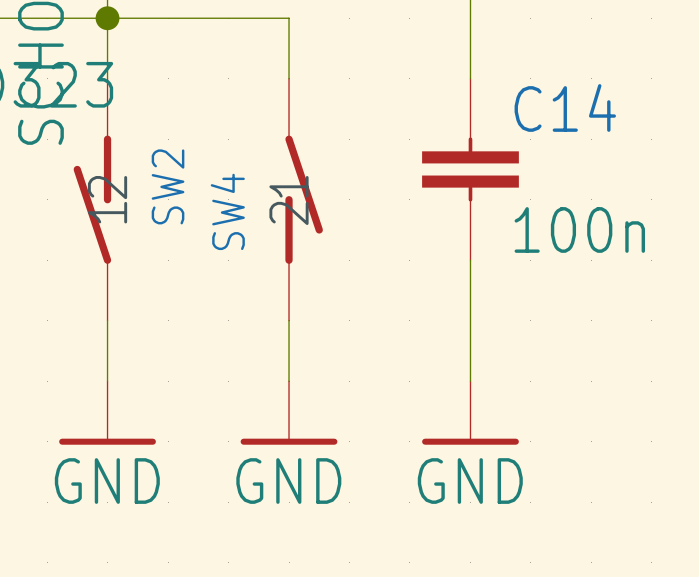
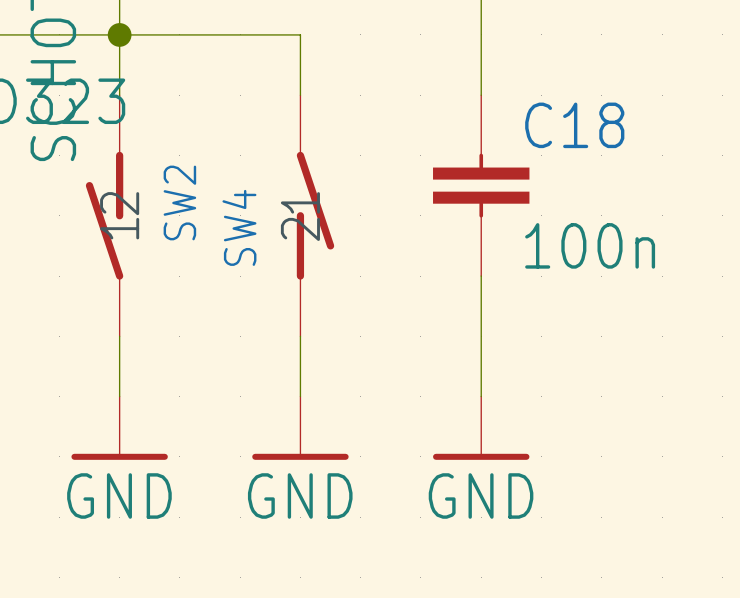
C14 name: C14 (565, 107) -> C18 (574, 125)

